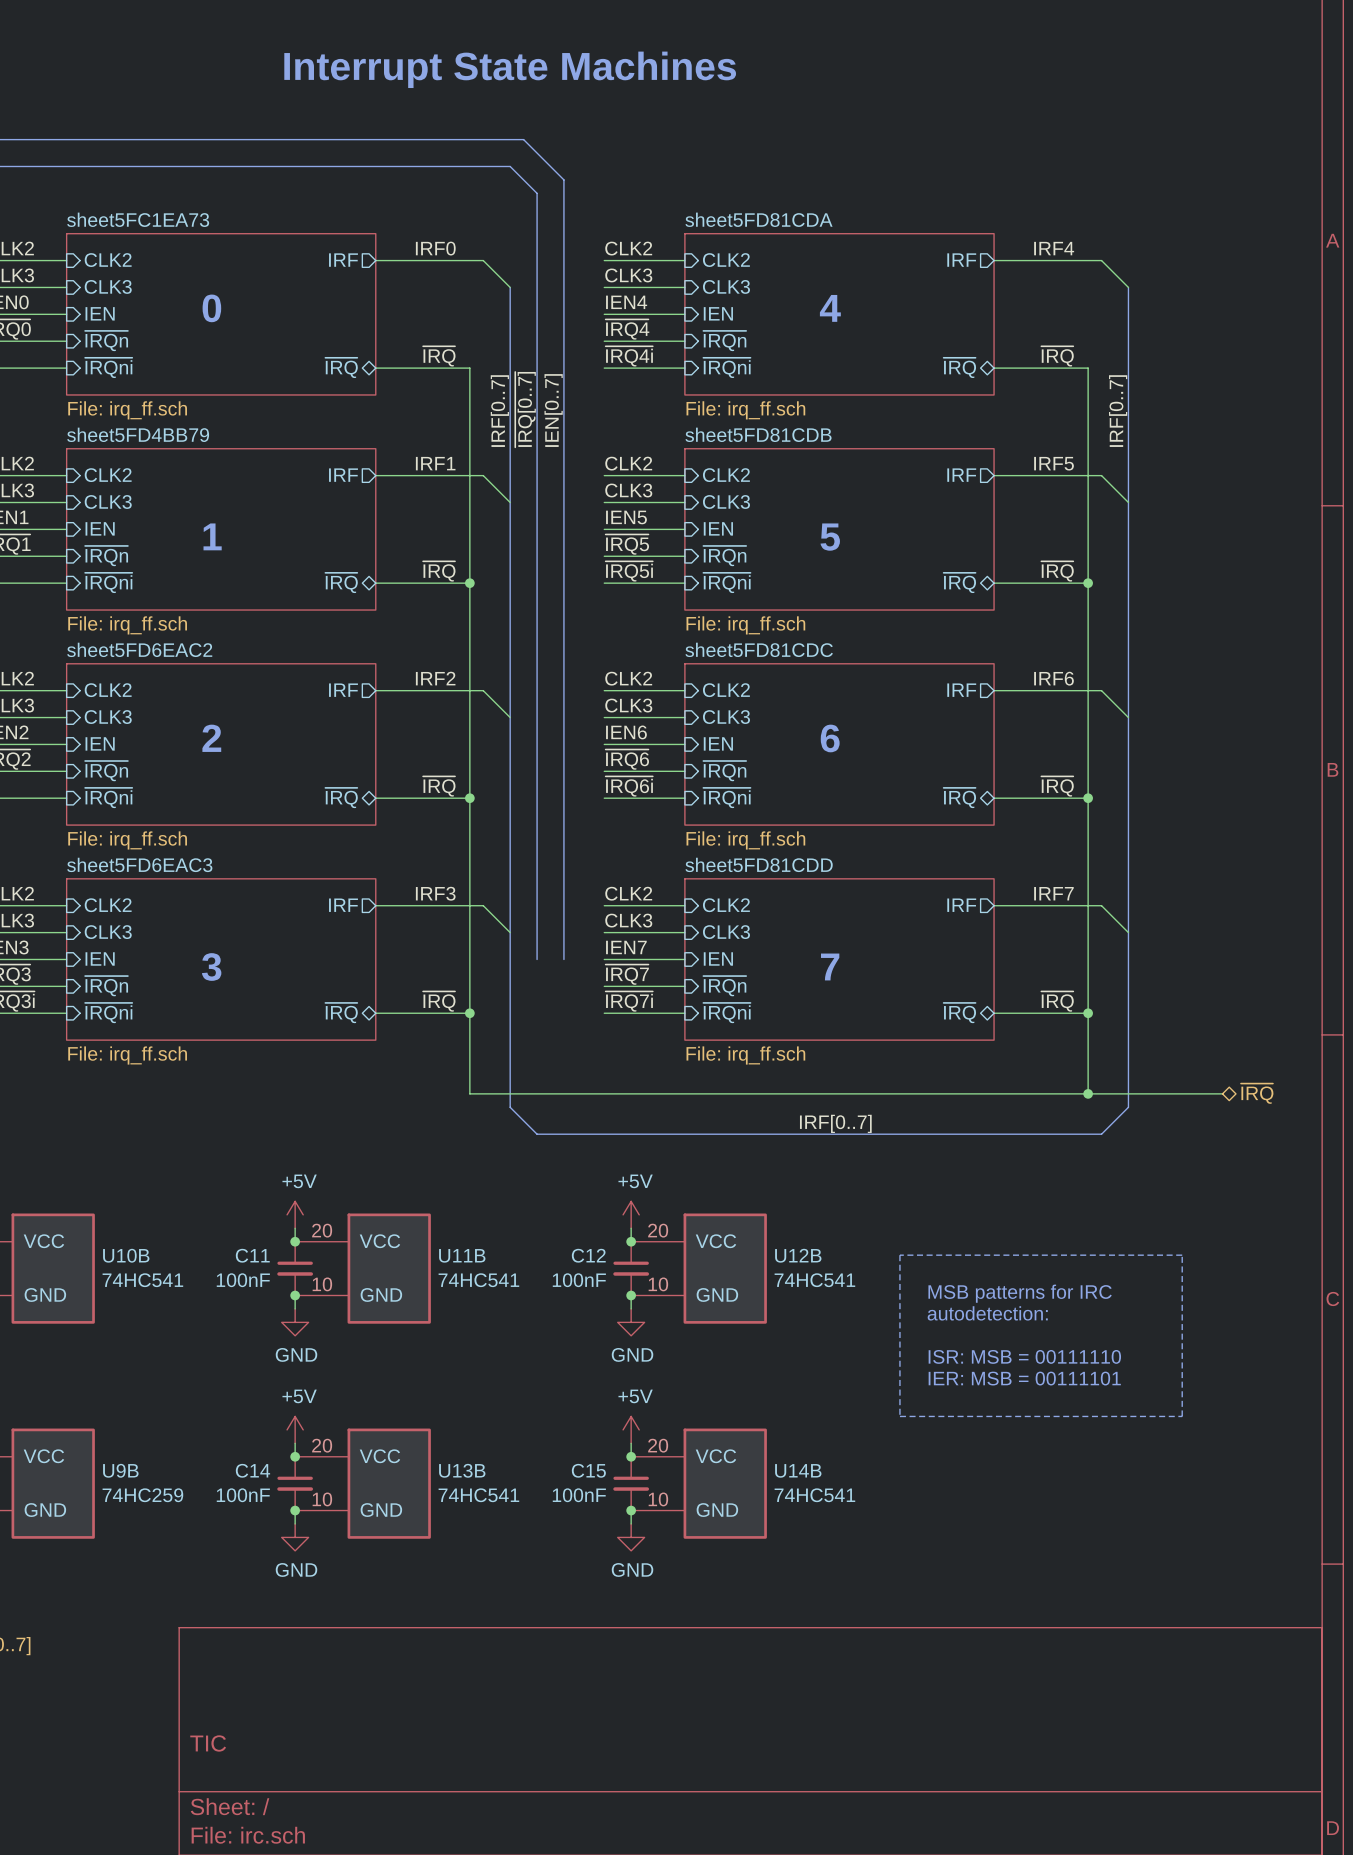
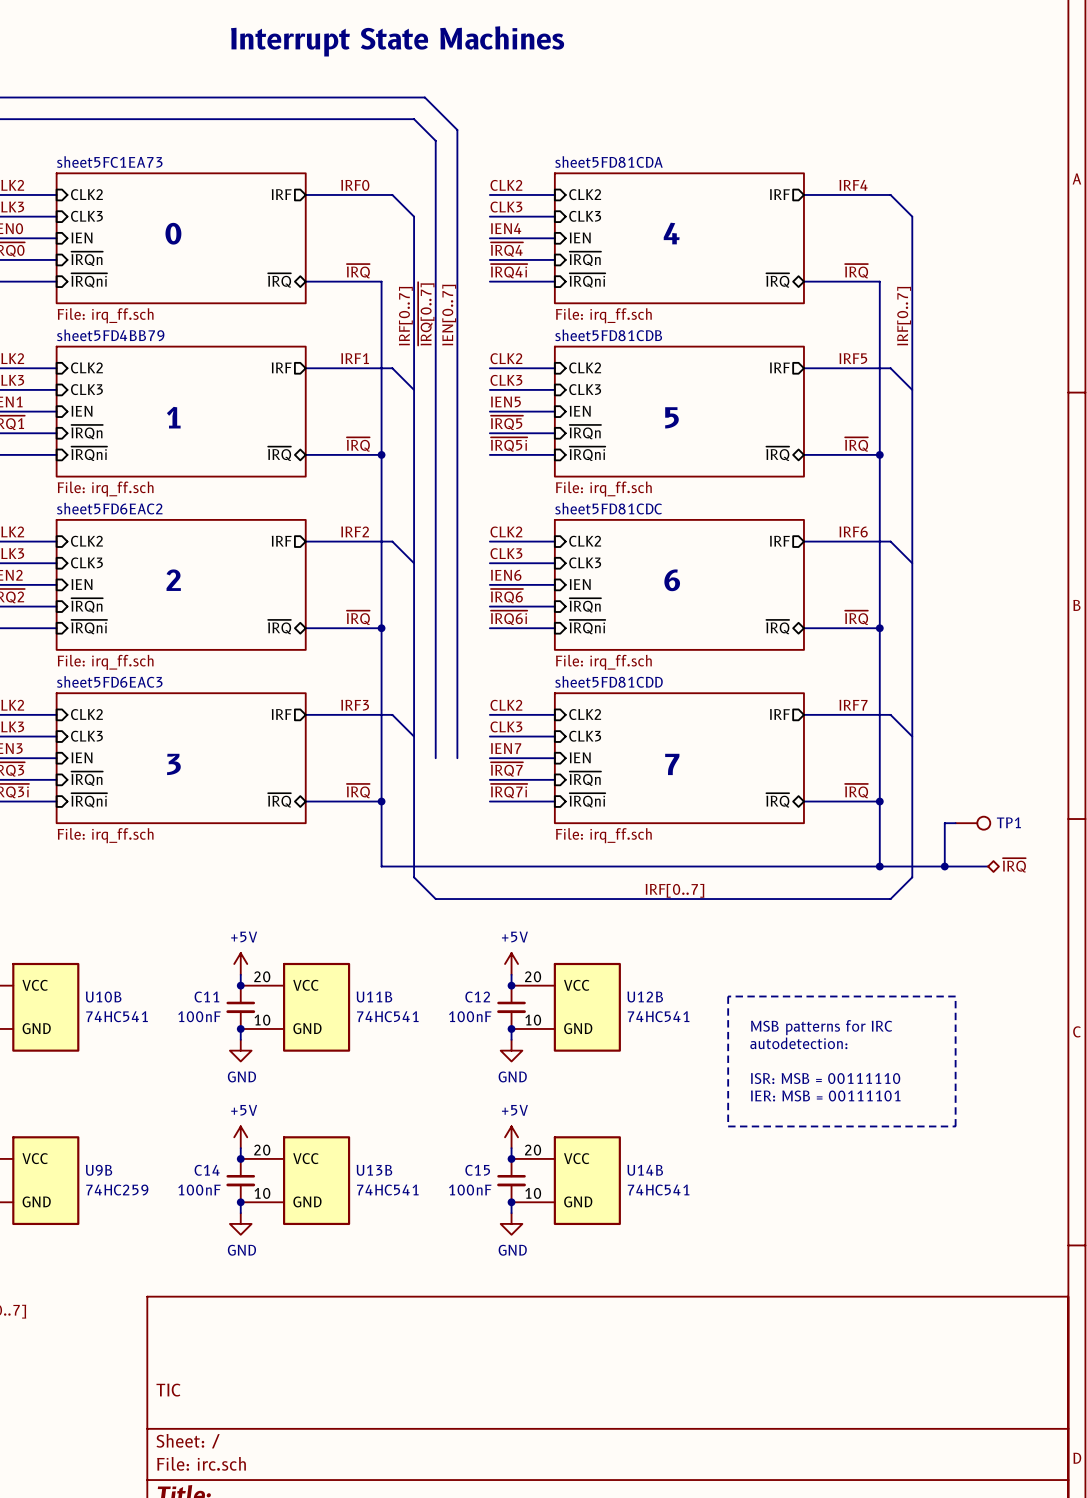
wire: none -> (955, 823) (944, 823) (944, 866)
TP1: none -> (972, 823)
junction: none -> (944, 866)

